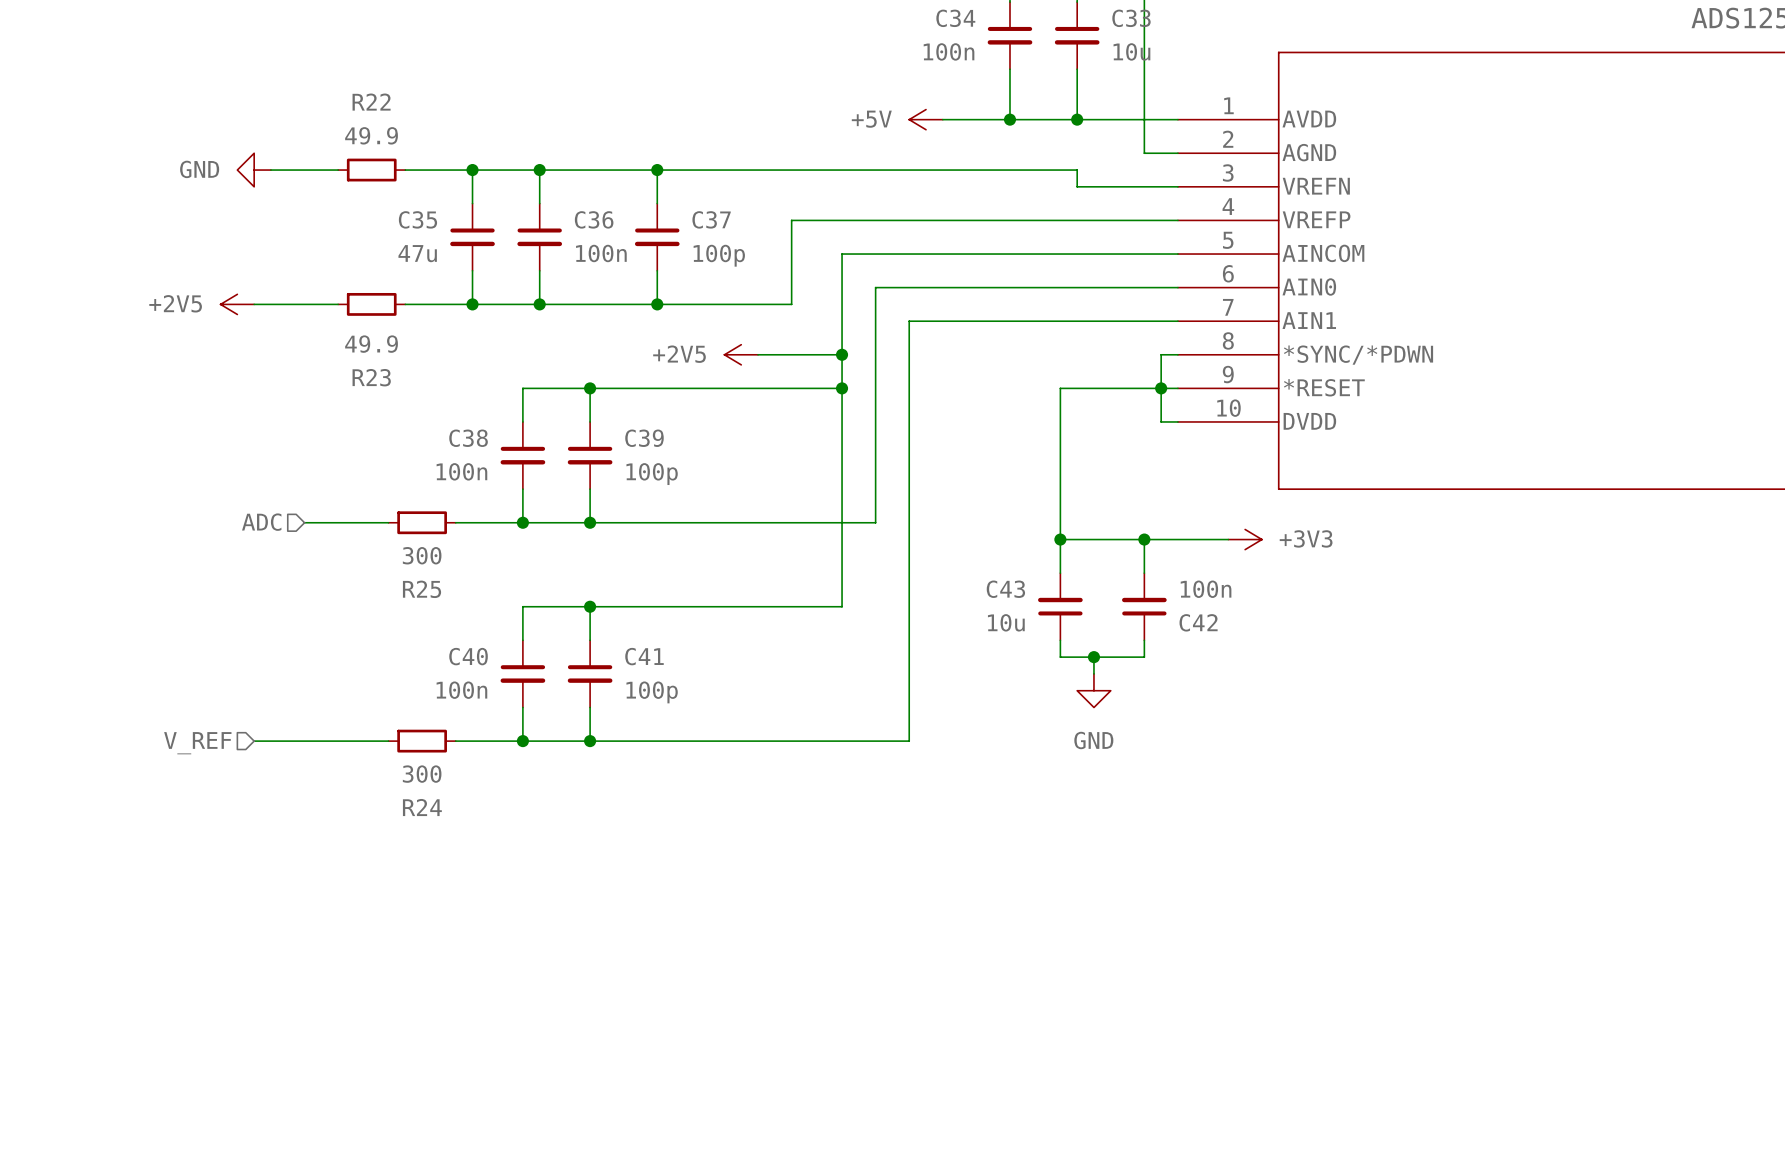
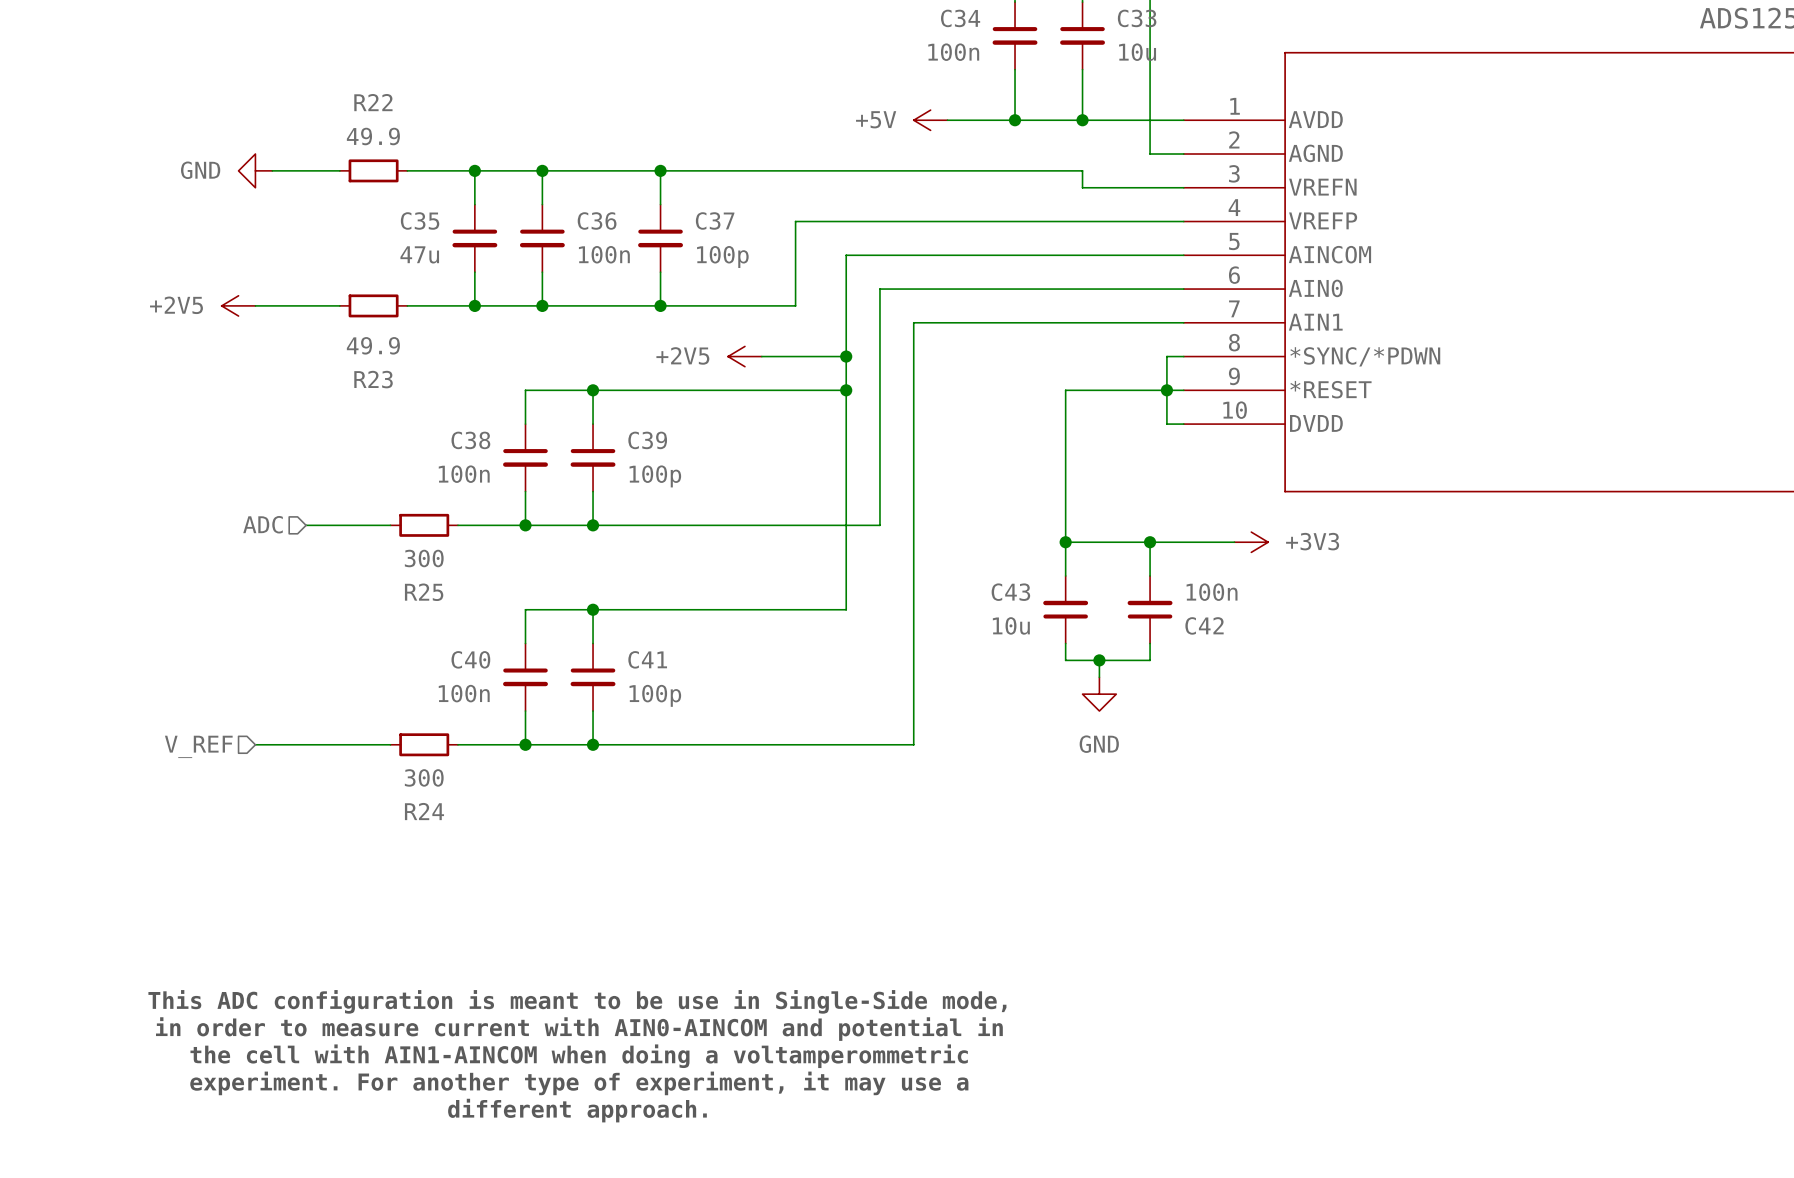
text: none -> This ADC configuration is meant to be use in Single-Side mode, (577, 1001)
text: none -> in order to measure current with AIN0-AINCOM and potential in (579, 1029)
text: none -> the cell with AIN1-AINCOM when doing a voltamperommetric (579, 1056)
text: none -> experiment. For another type of experiment, it may use a (579, 1083)
text: none -> different approach. (577, 1110)

